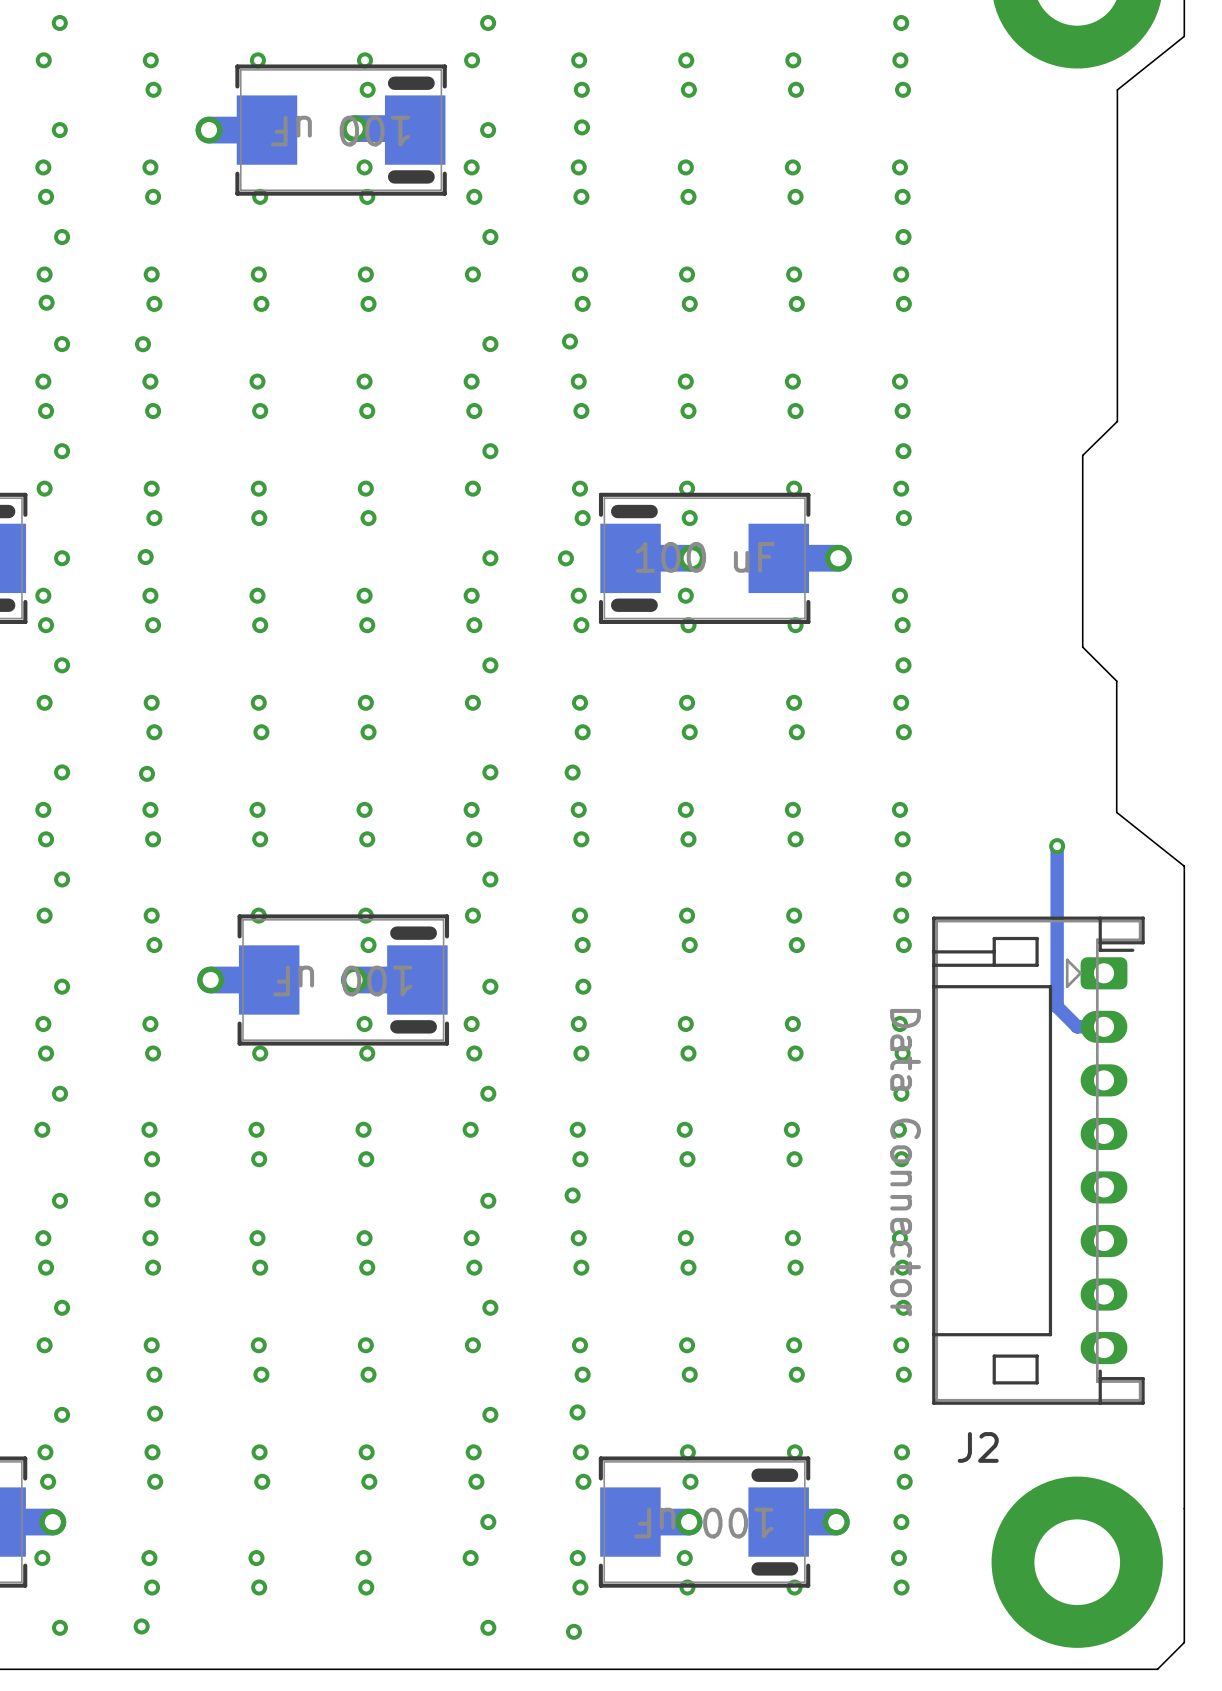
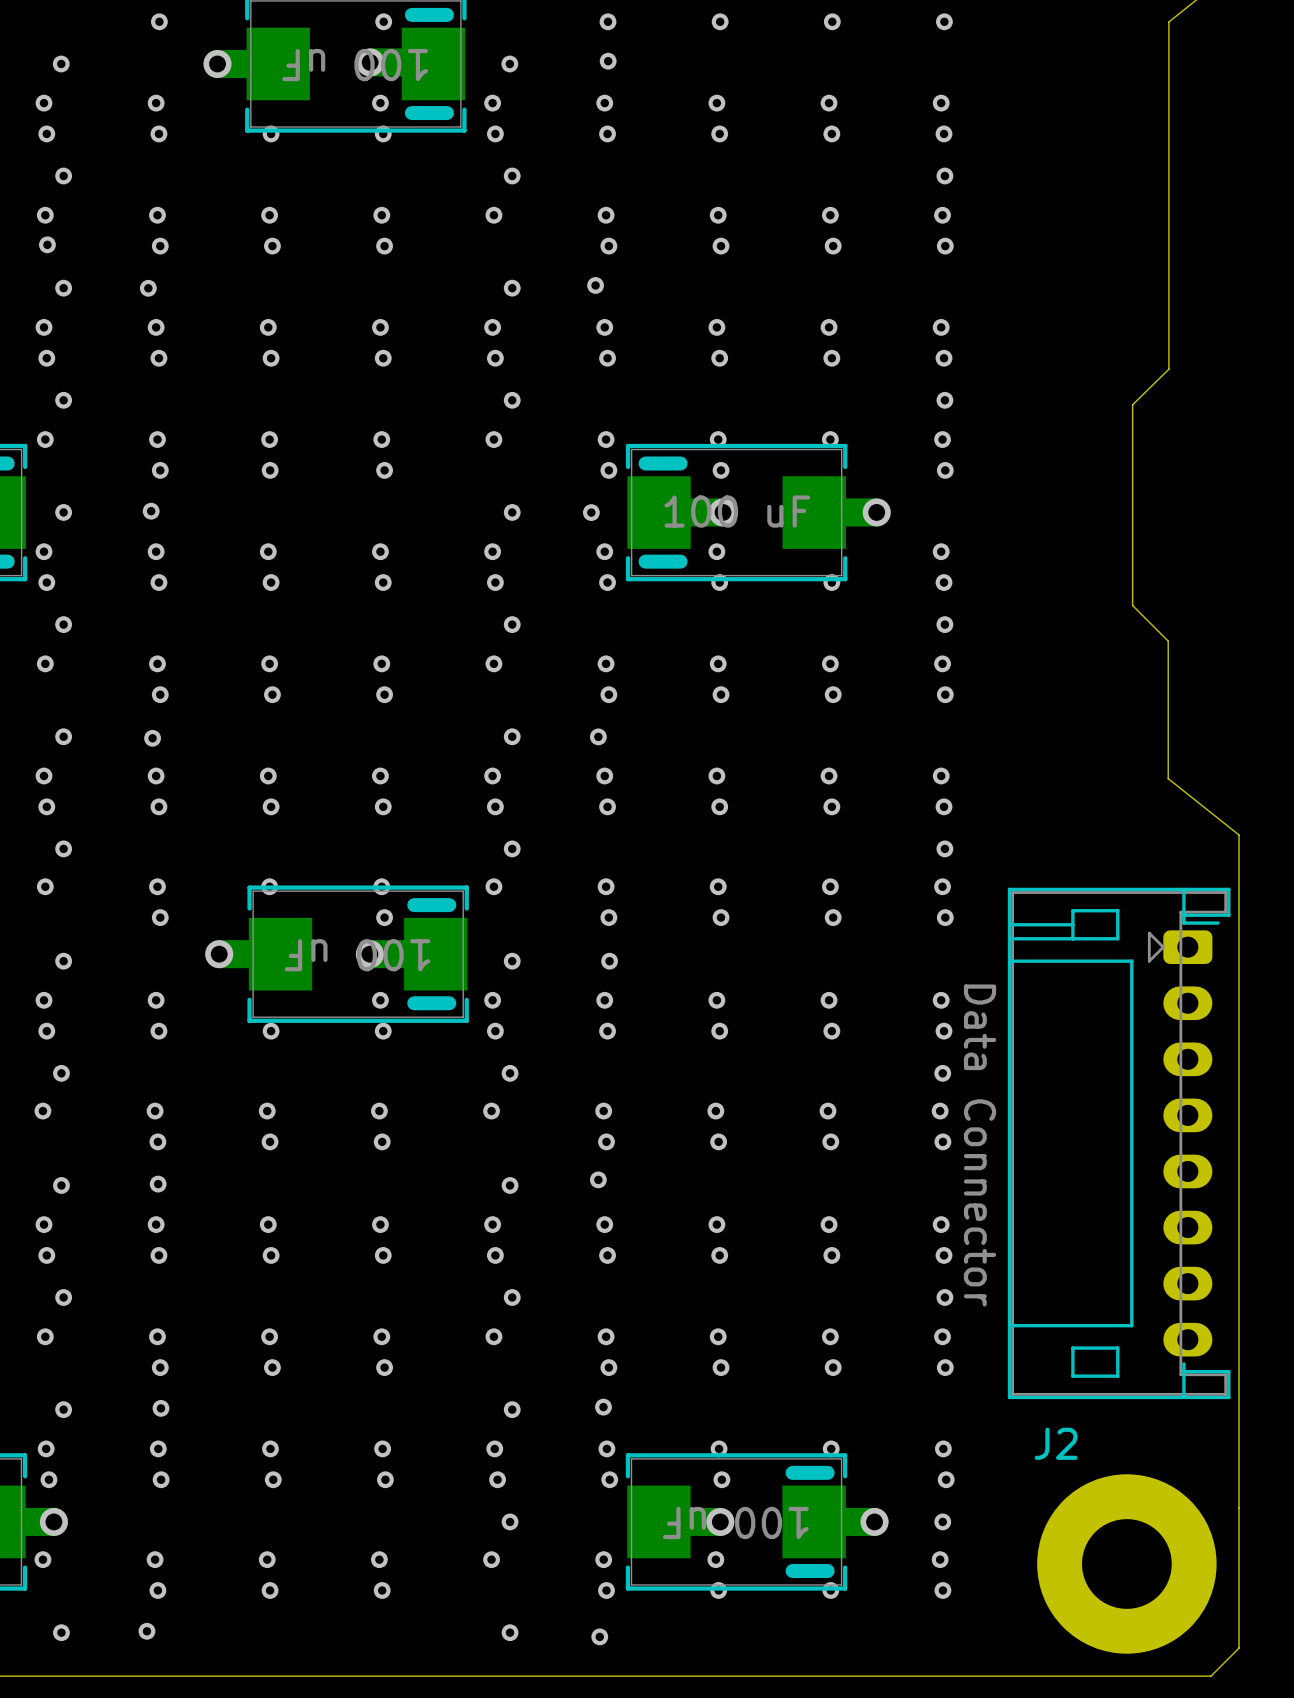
track: (1057, 846) (1057, 1006) (1077, 1026) (1104, 1026) -> none
via: (1057, 846) -> none
J2 position: (1038, 1160) -> (1119, 1143)

